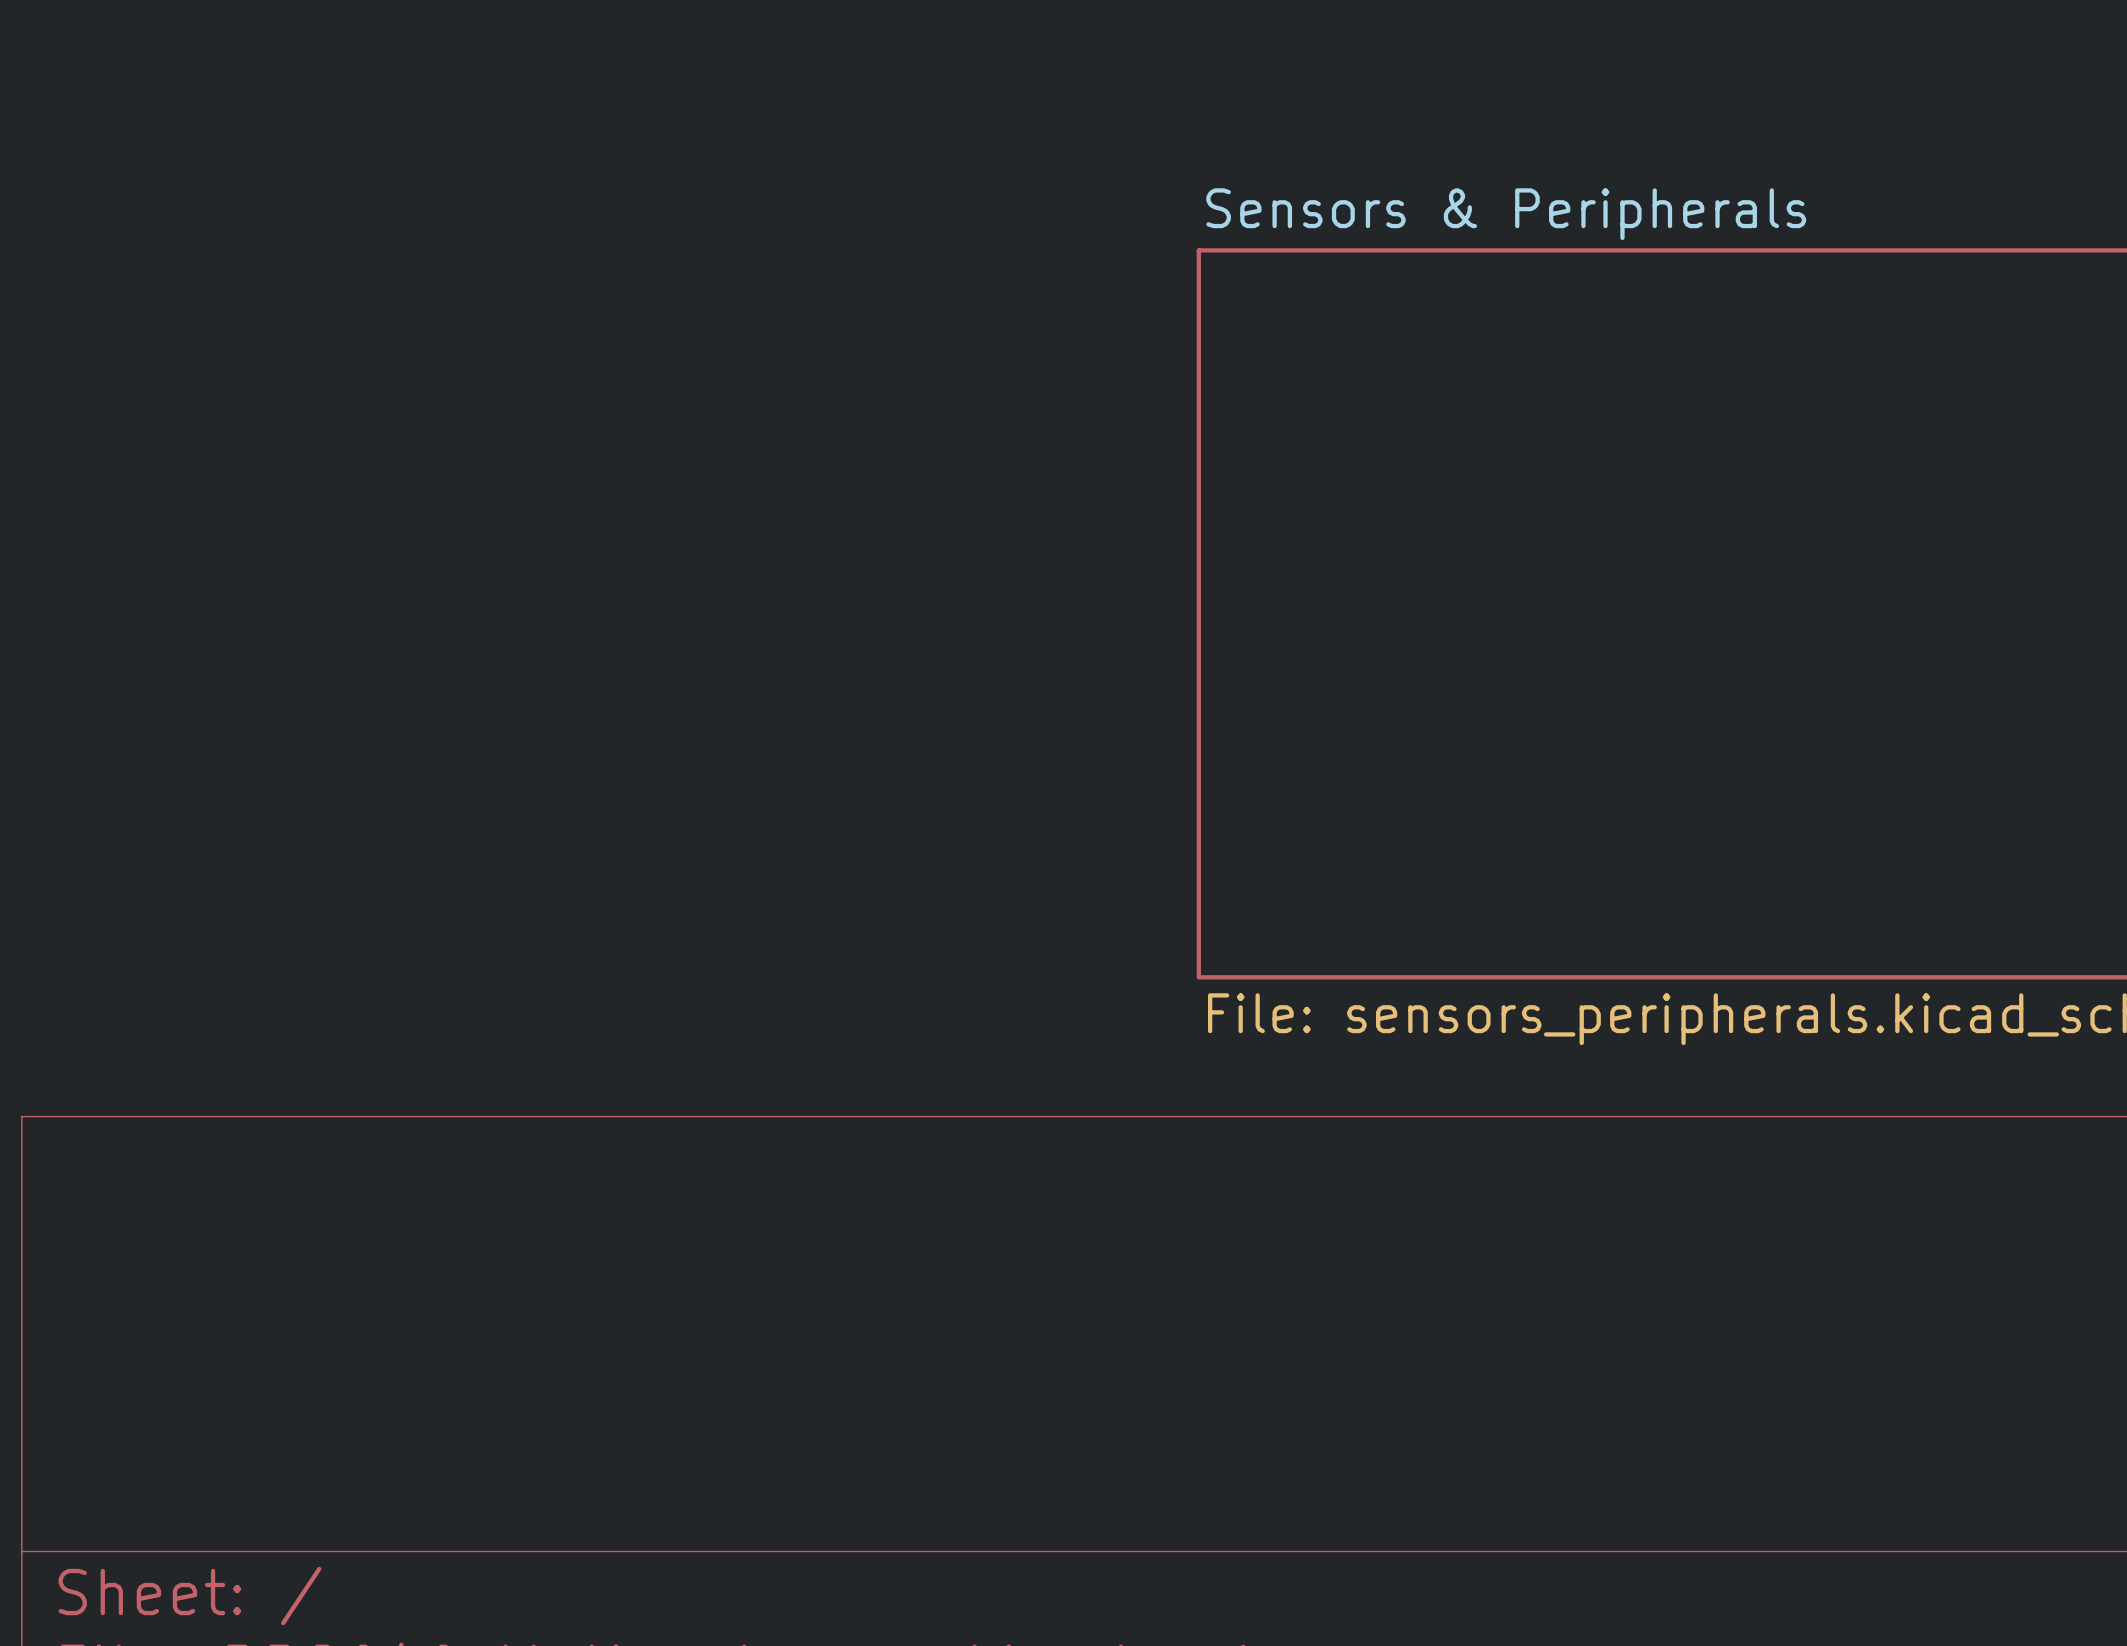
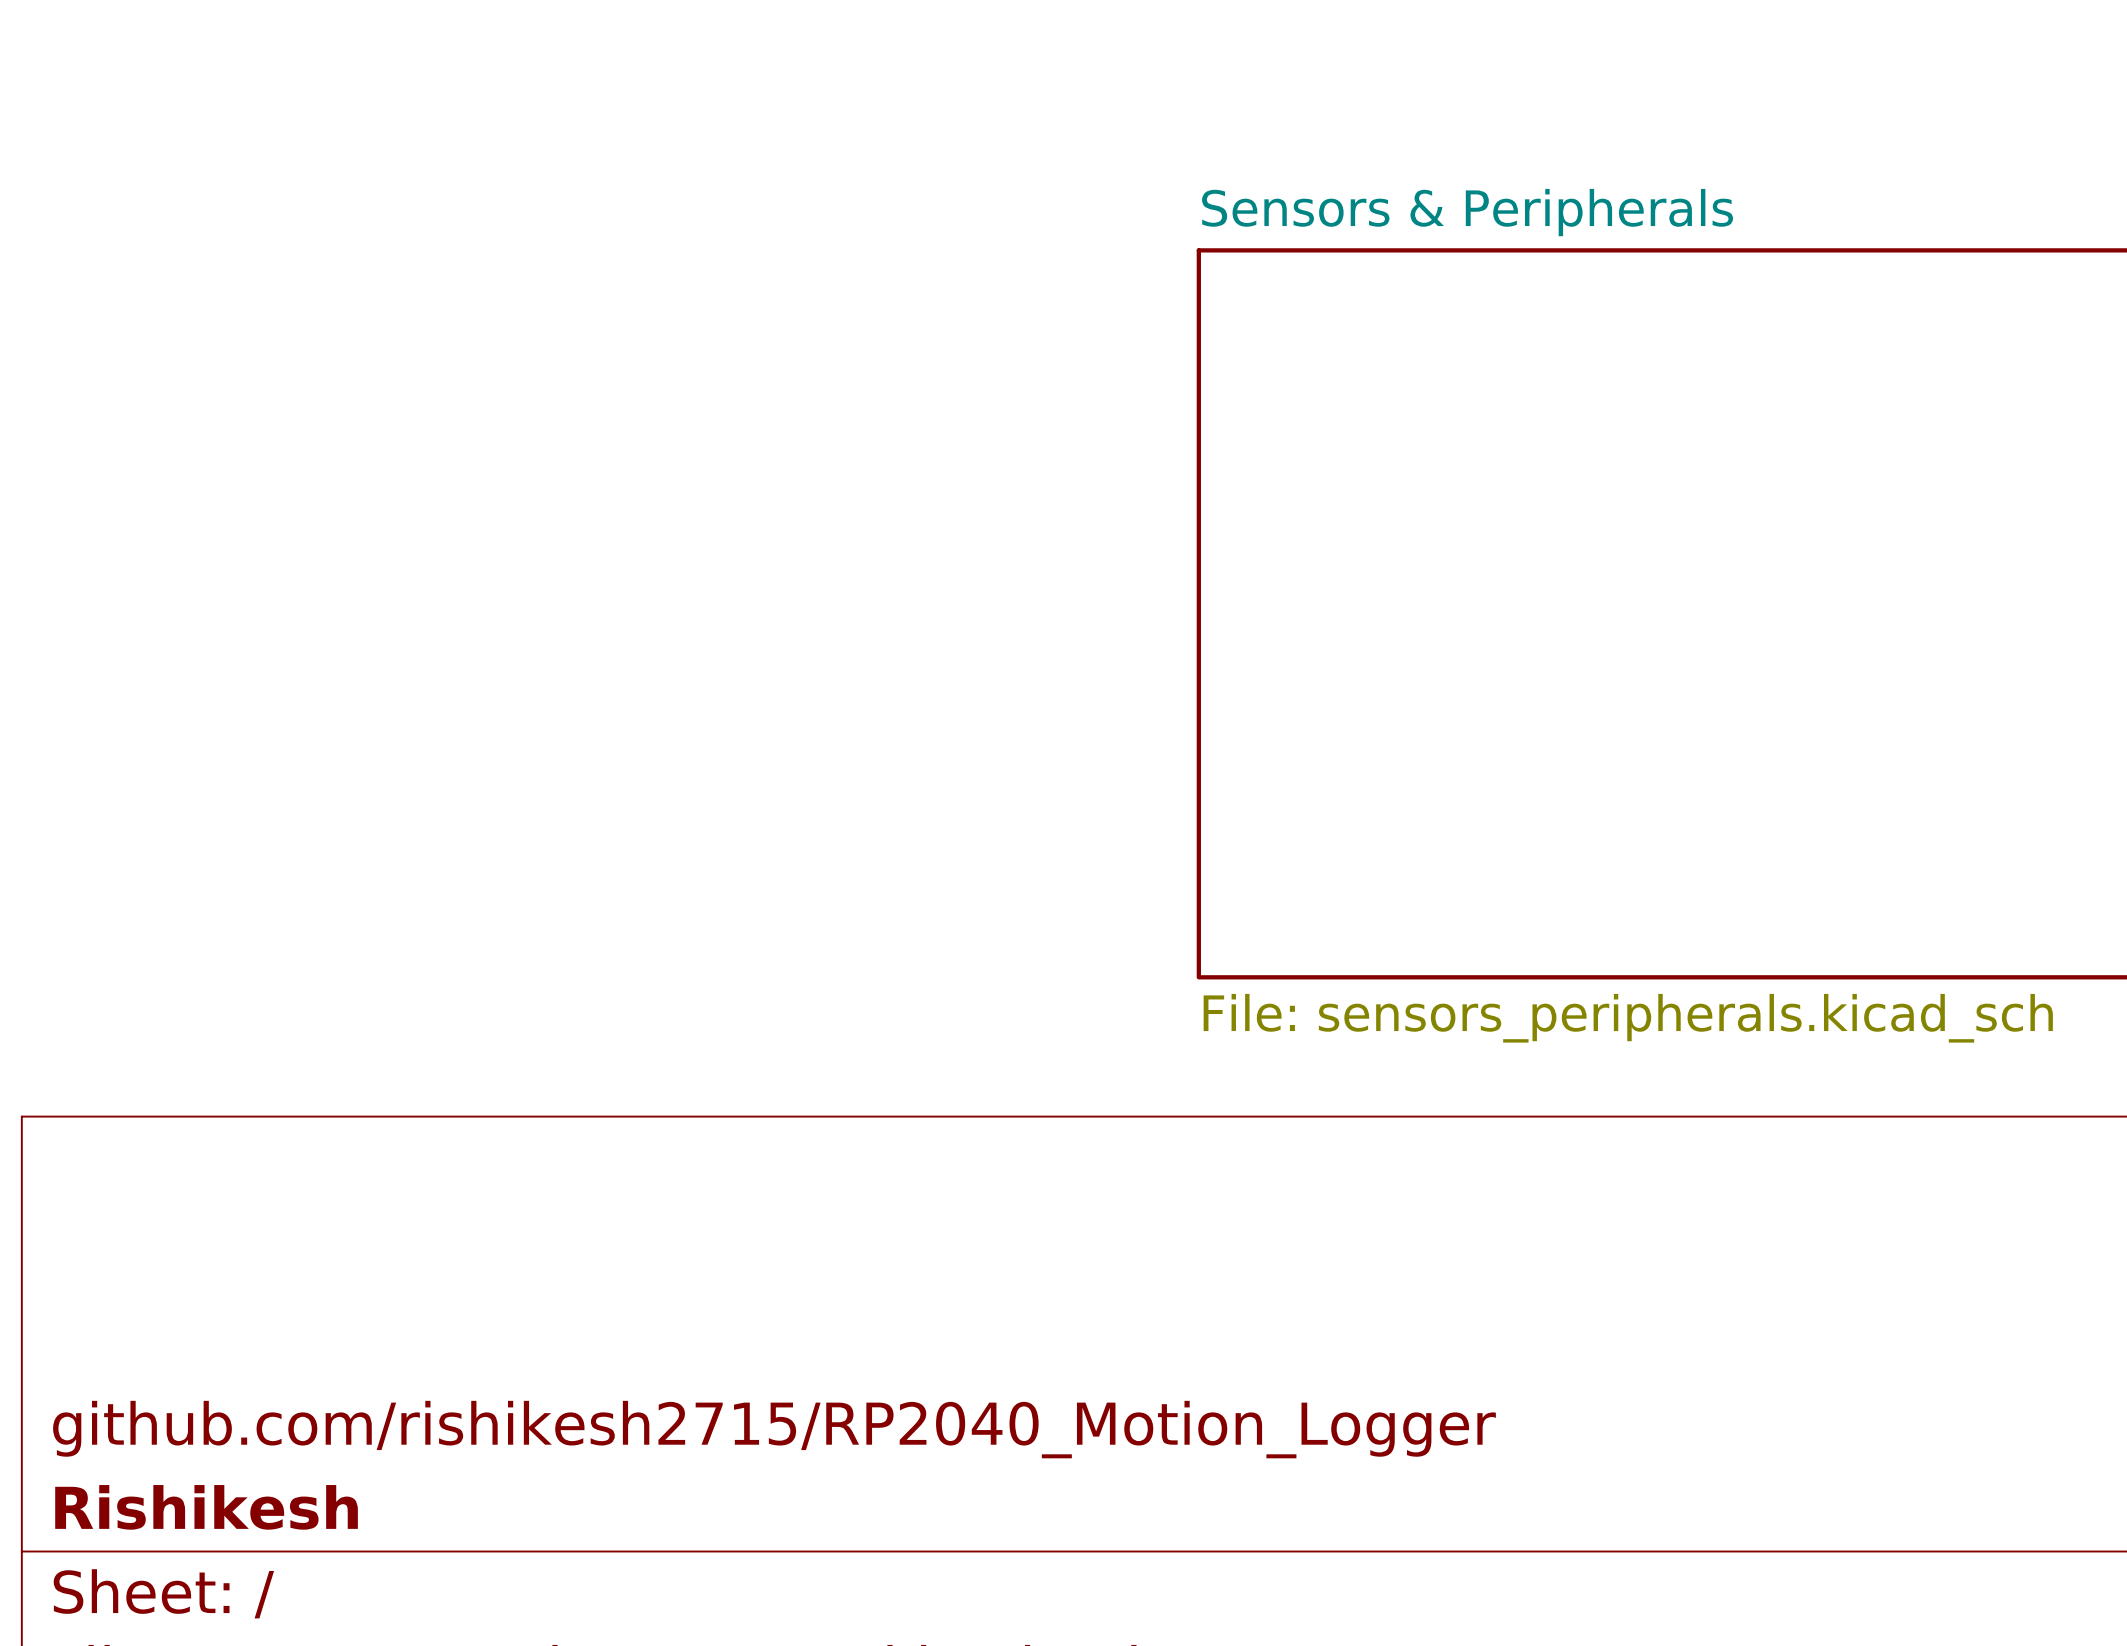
title block: none -> github.com/rishikesh2715/RP2040_Motion_Logger (774, 1429)
title block: none -> Rishikesh (206, 1507)

